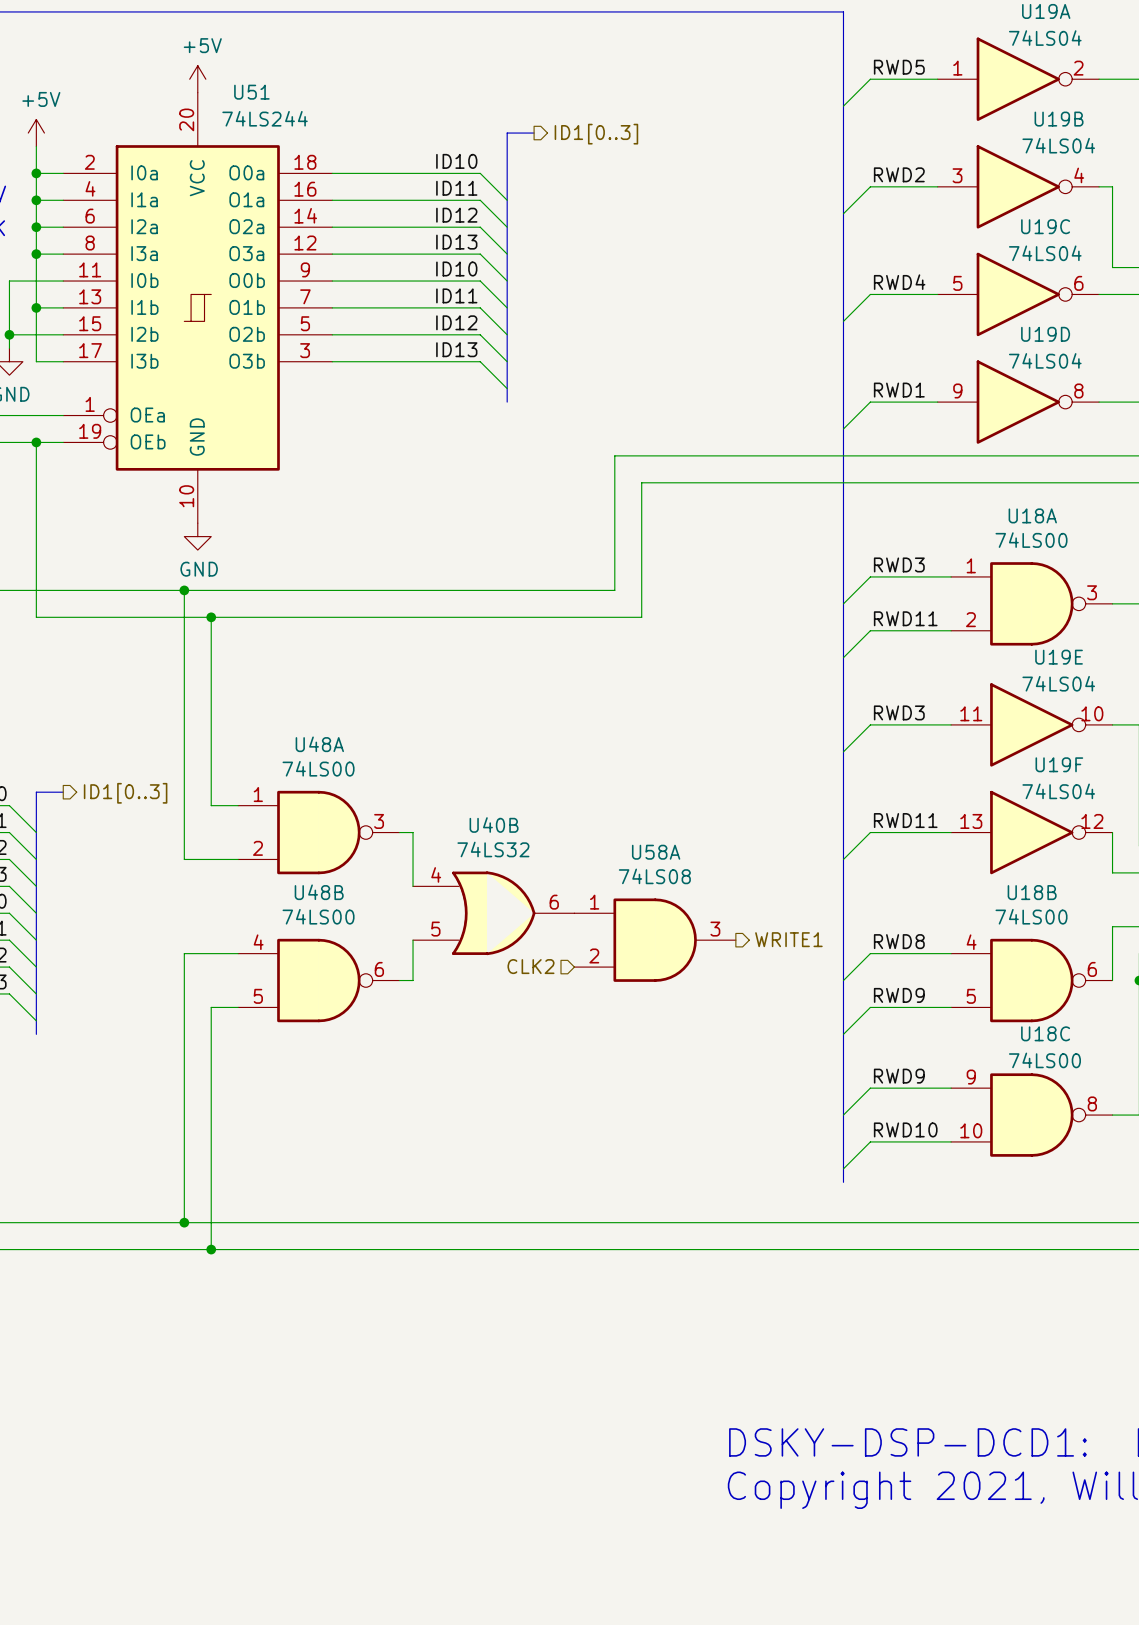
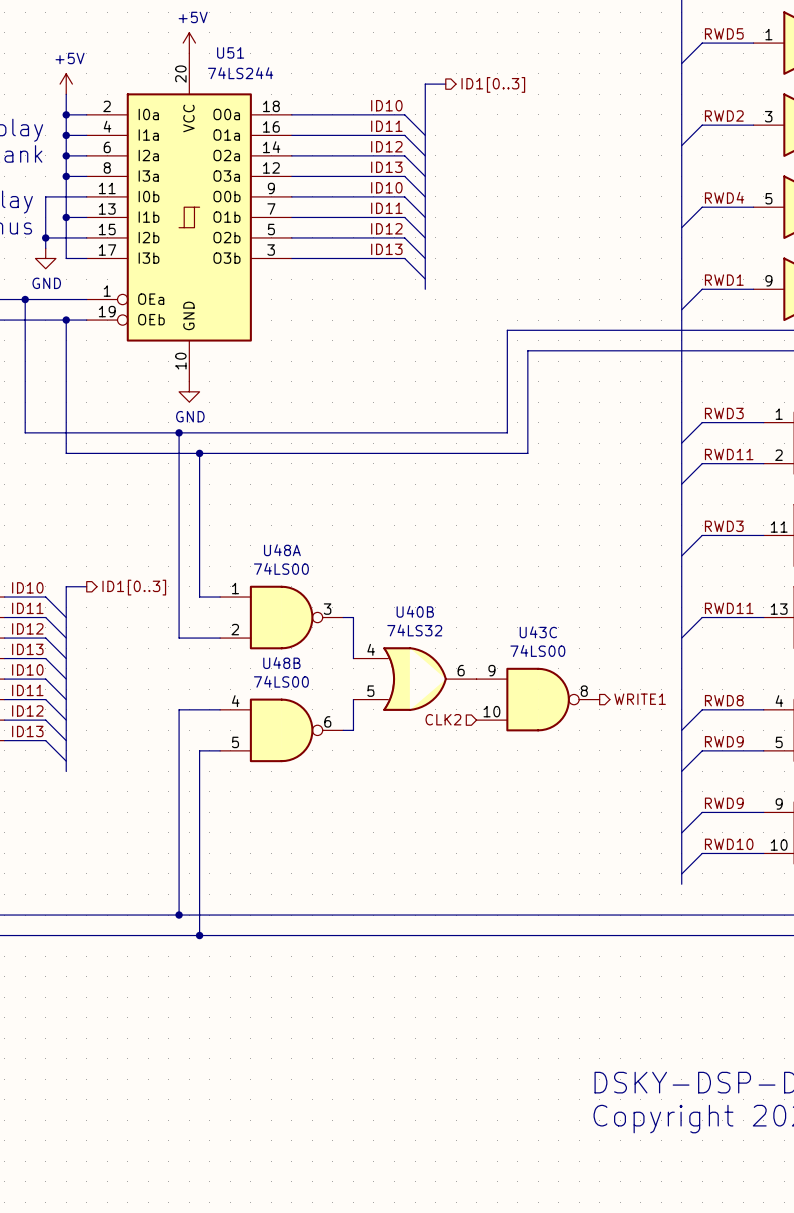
U58A: 74LS08 (655, 940) -> none
U43C: none -> 74LS00 (538, 699)

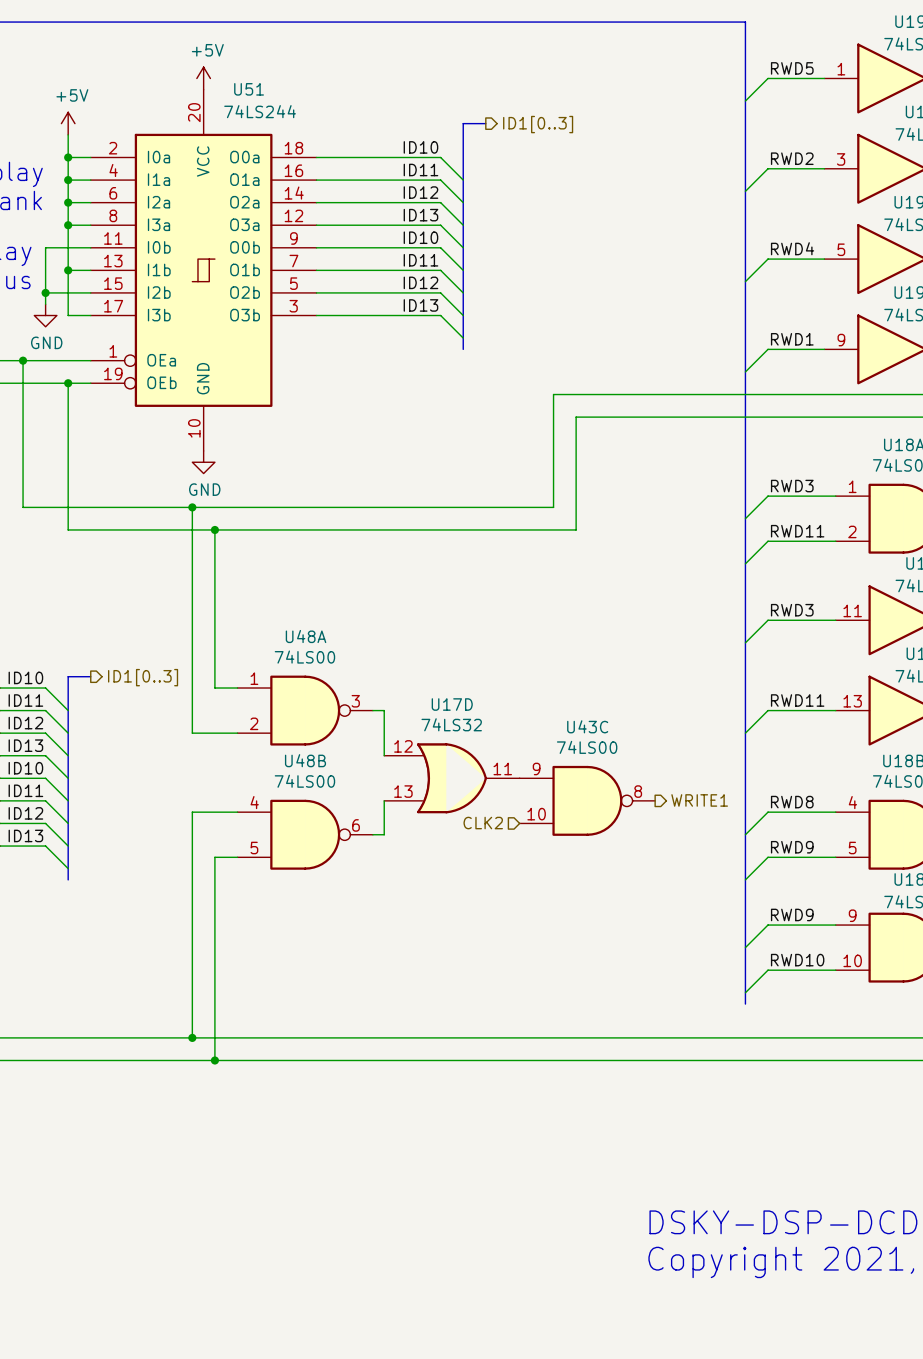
U40B name: U40B (415, 611) -> U17D (452, 704)
U40B pin number: 4 (371, 649) -> 12 (403, 746)
U40B pin number: 6 (461, 670) -> 11 (502, 768)
U40B pin number: 5 (370, 691) -> 13 (403, 791)

